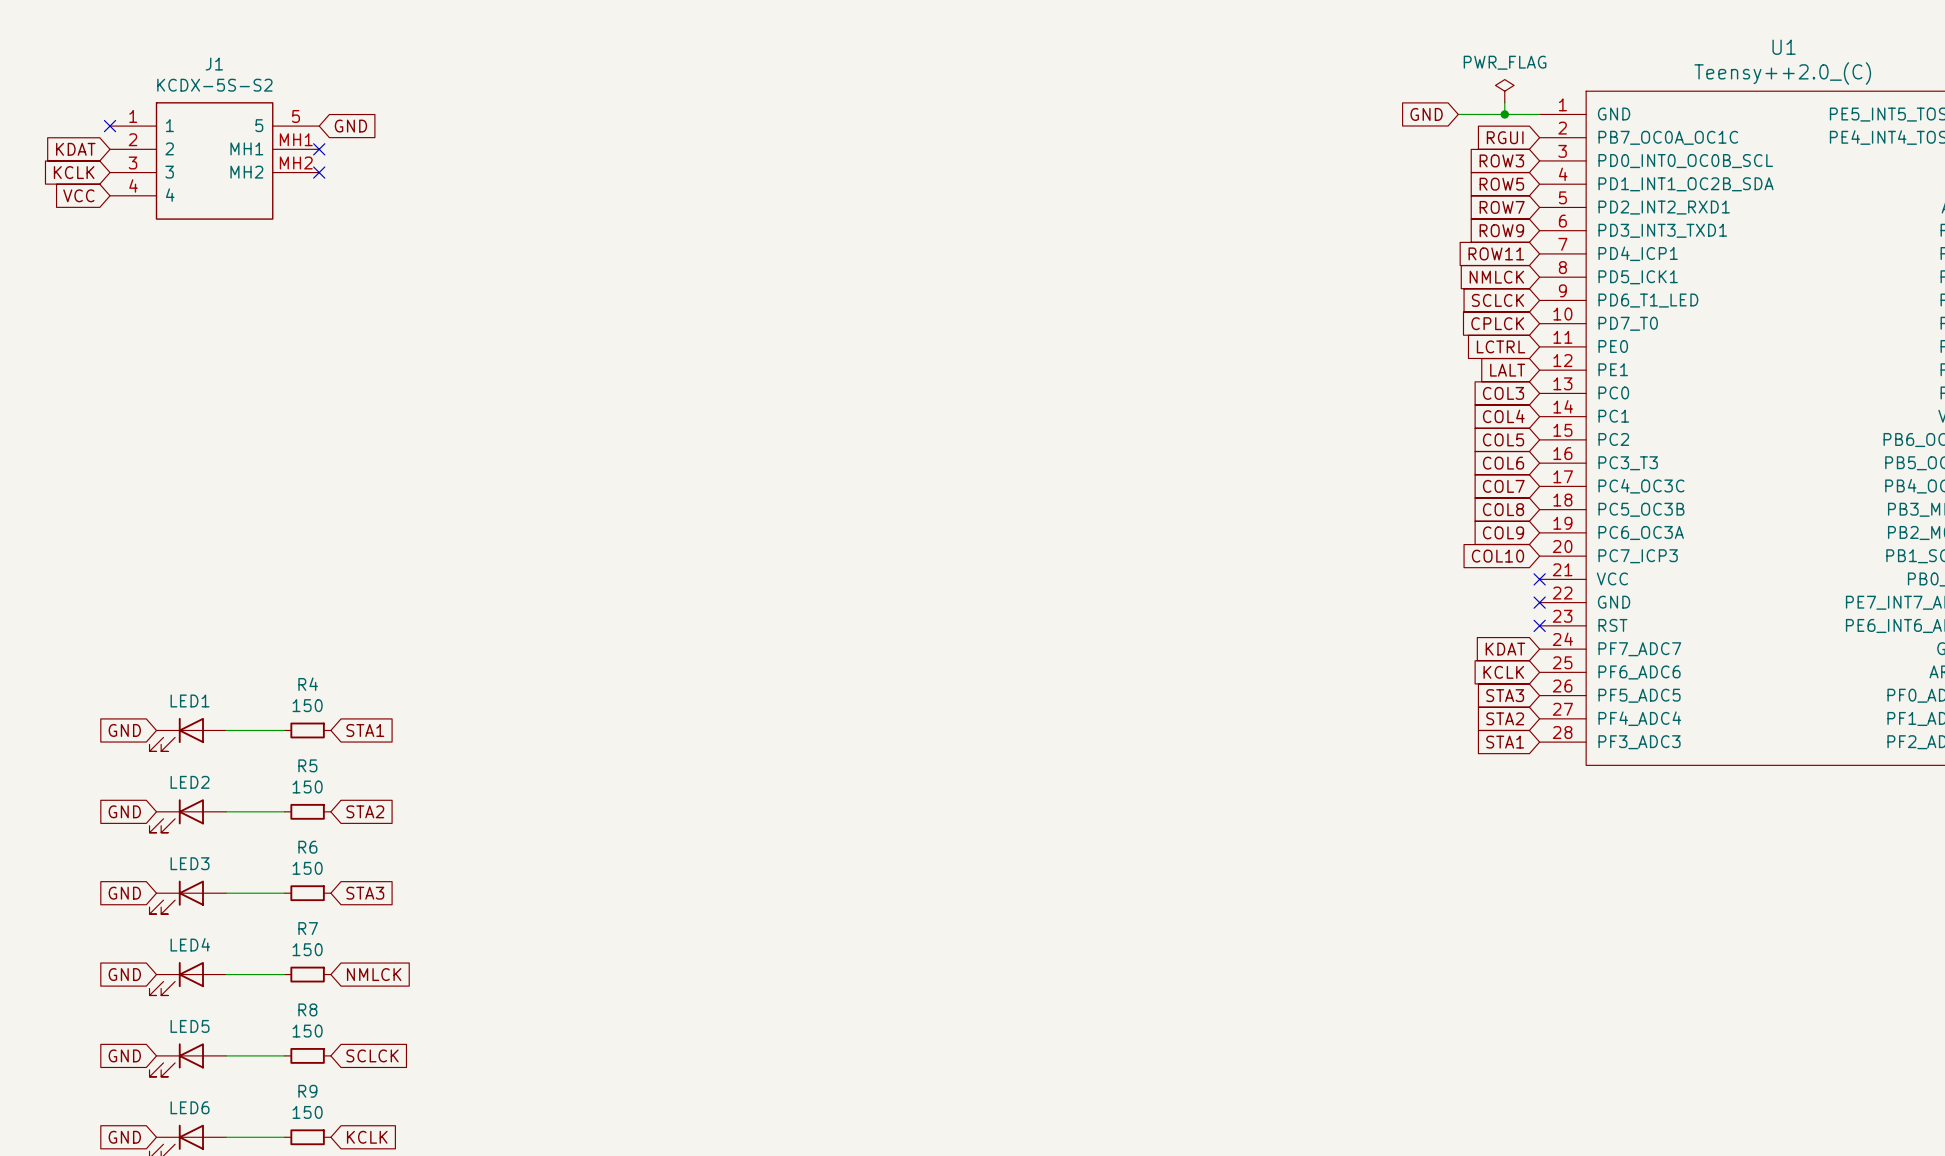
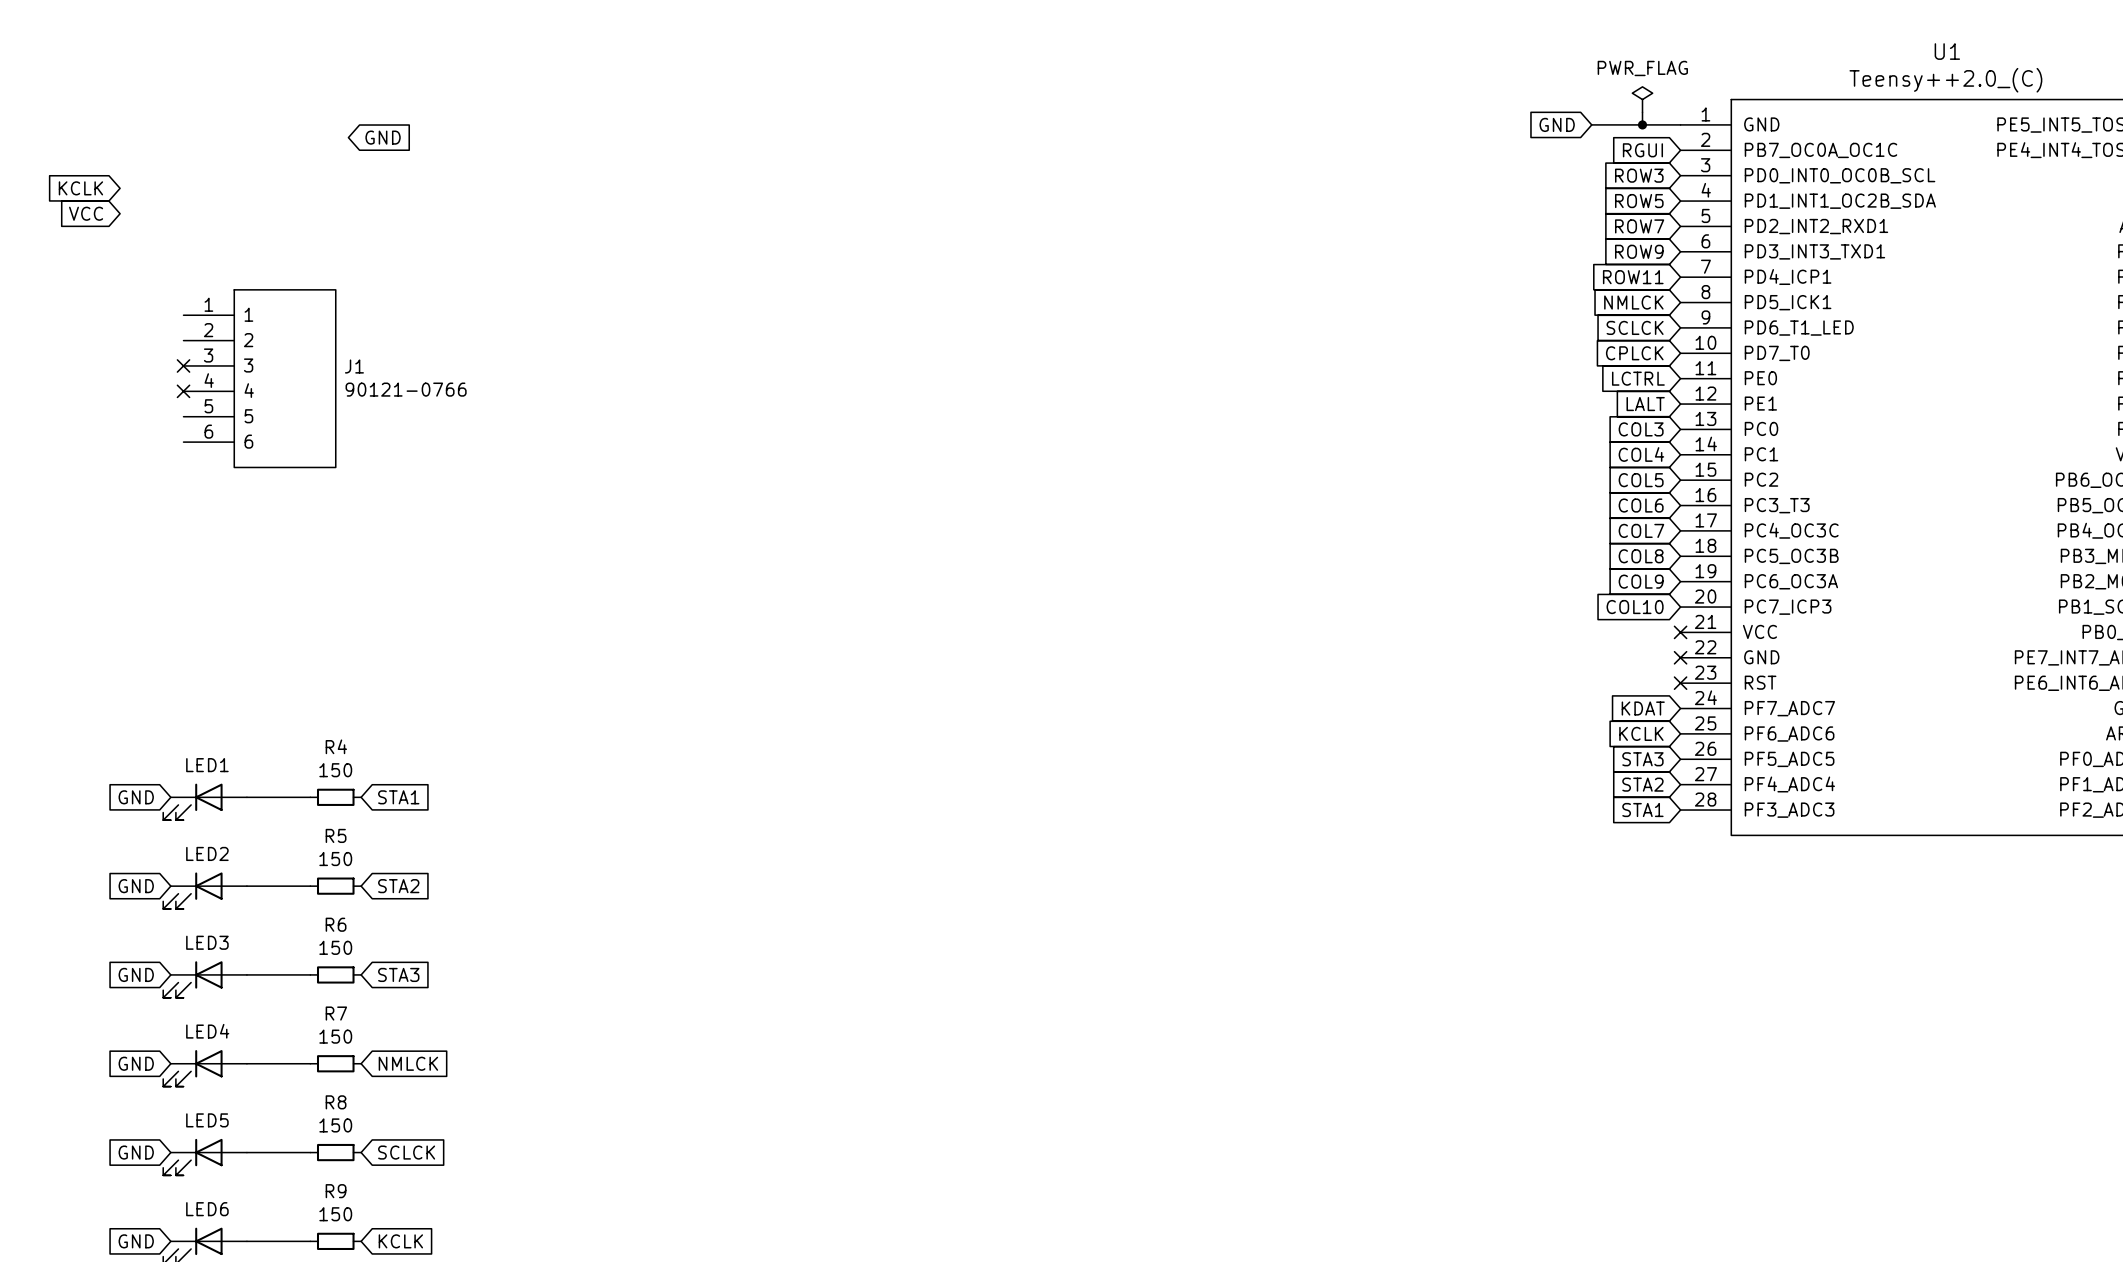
J1 name position: J1 (214, 64) -> J1 (354, 366)
J1 value: KCDX-5S-S2 (214, 85) -> 90121-0766 (406, 389)
J1 symbol: [110, 102, 320, 220] -> [183, 289, 337, 469]
no-connect mark: (110, 126) -> none
global label: KDAT (75, 149) -> none
no-connect mark: (319, 149) -> none
no-connect mark: (319, 172) -> none
no-connect mark: none -> (183, 365)
no-connect mark: none -> (183, 391)

